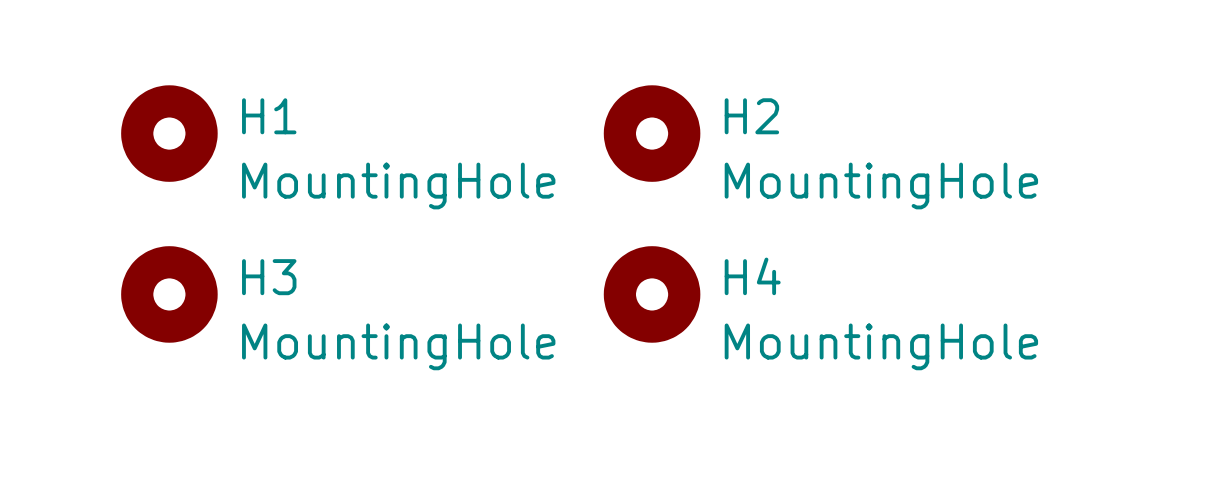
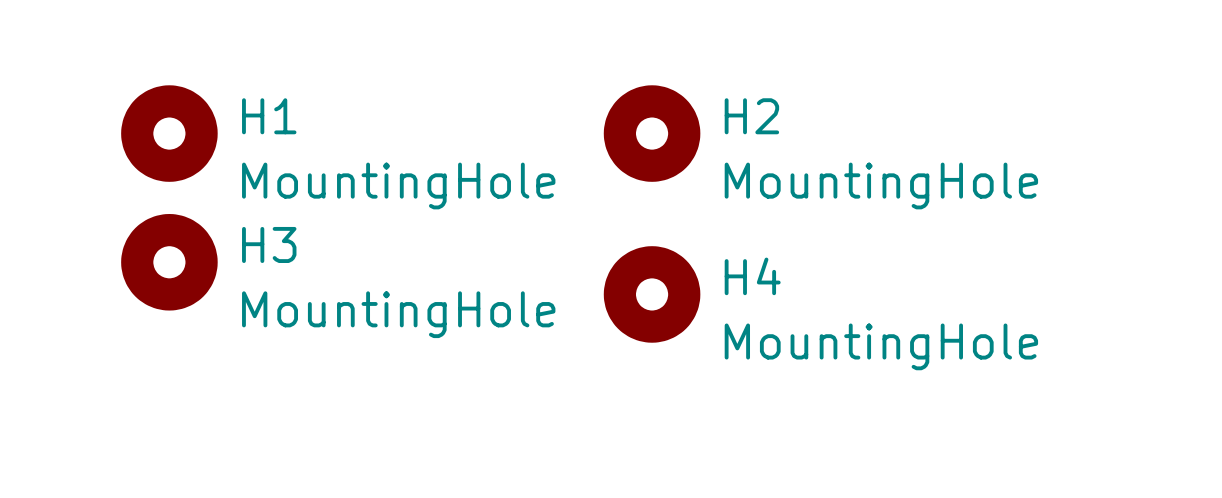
H3 position: (169, 294) -> (169, 262)

